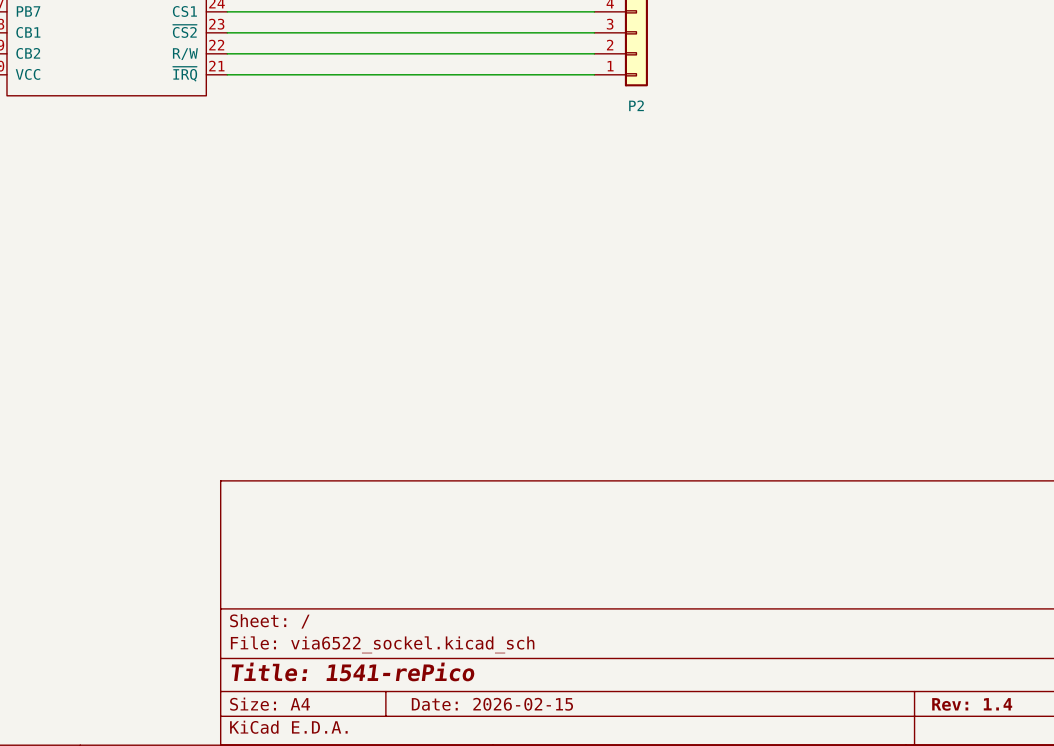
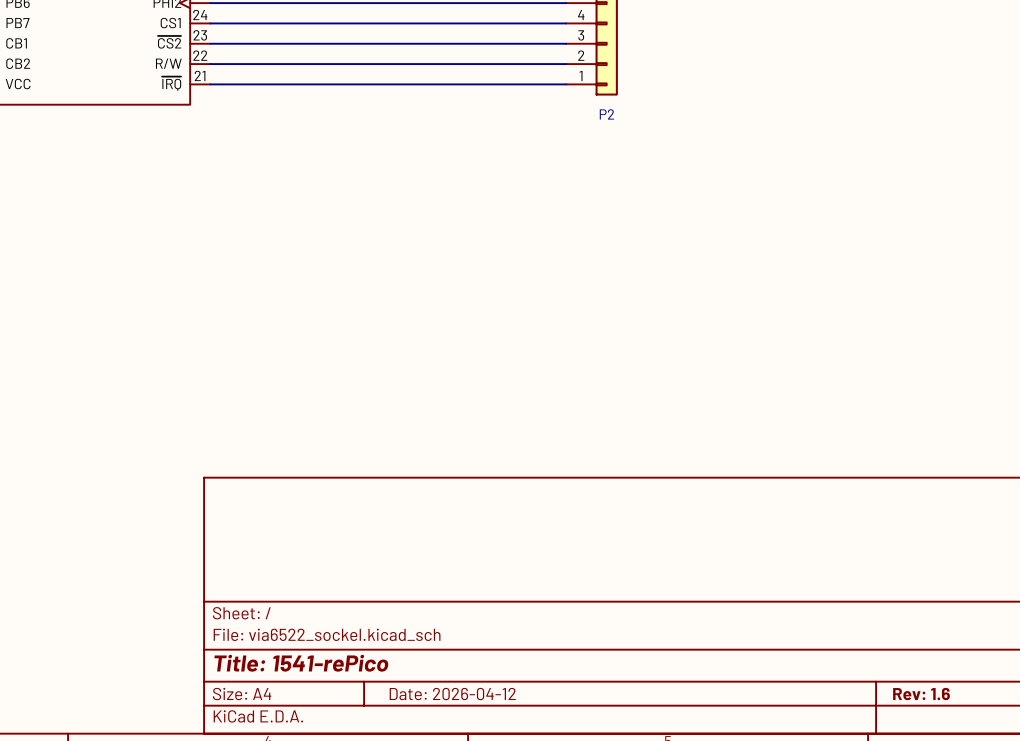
title block: Date: 2026-02-15 (492, 704) -> Date: 2026-04-12 (452, 694)
title block: Rev: 1.4 (972, 704) -> Rev: 1.6 (921, 694)

